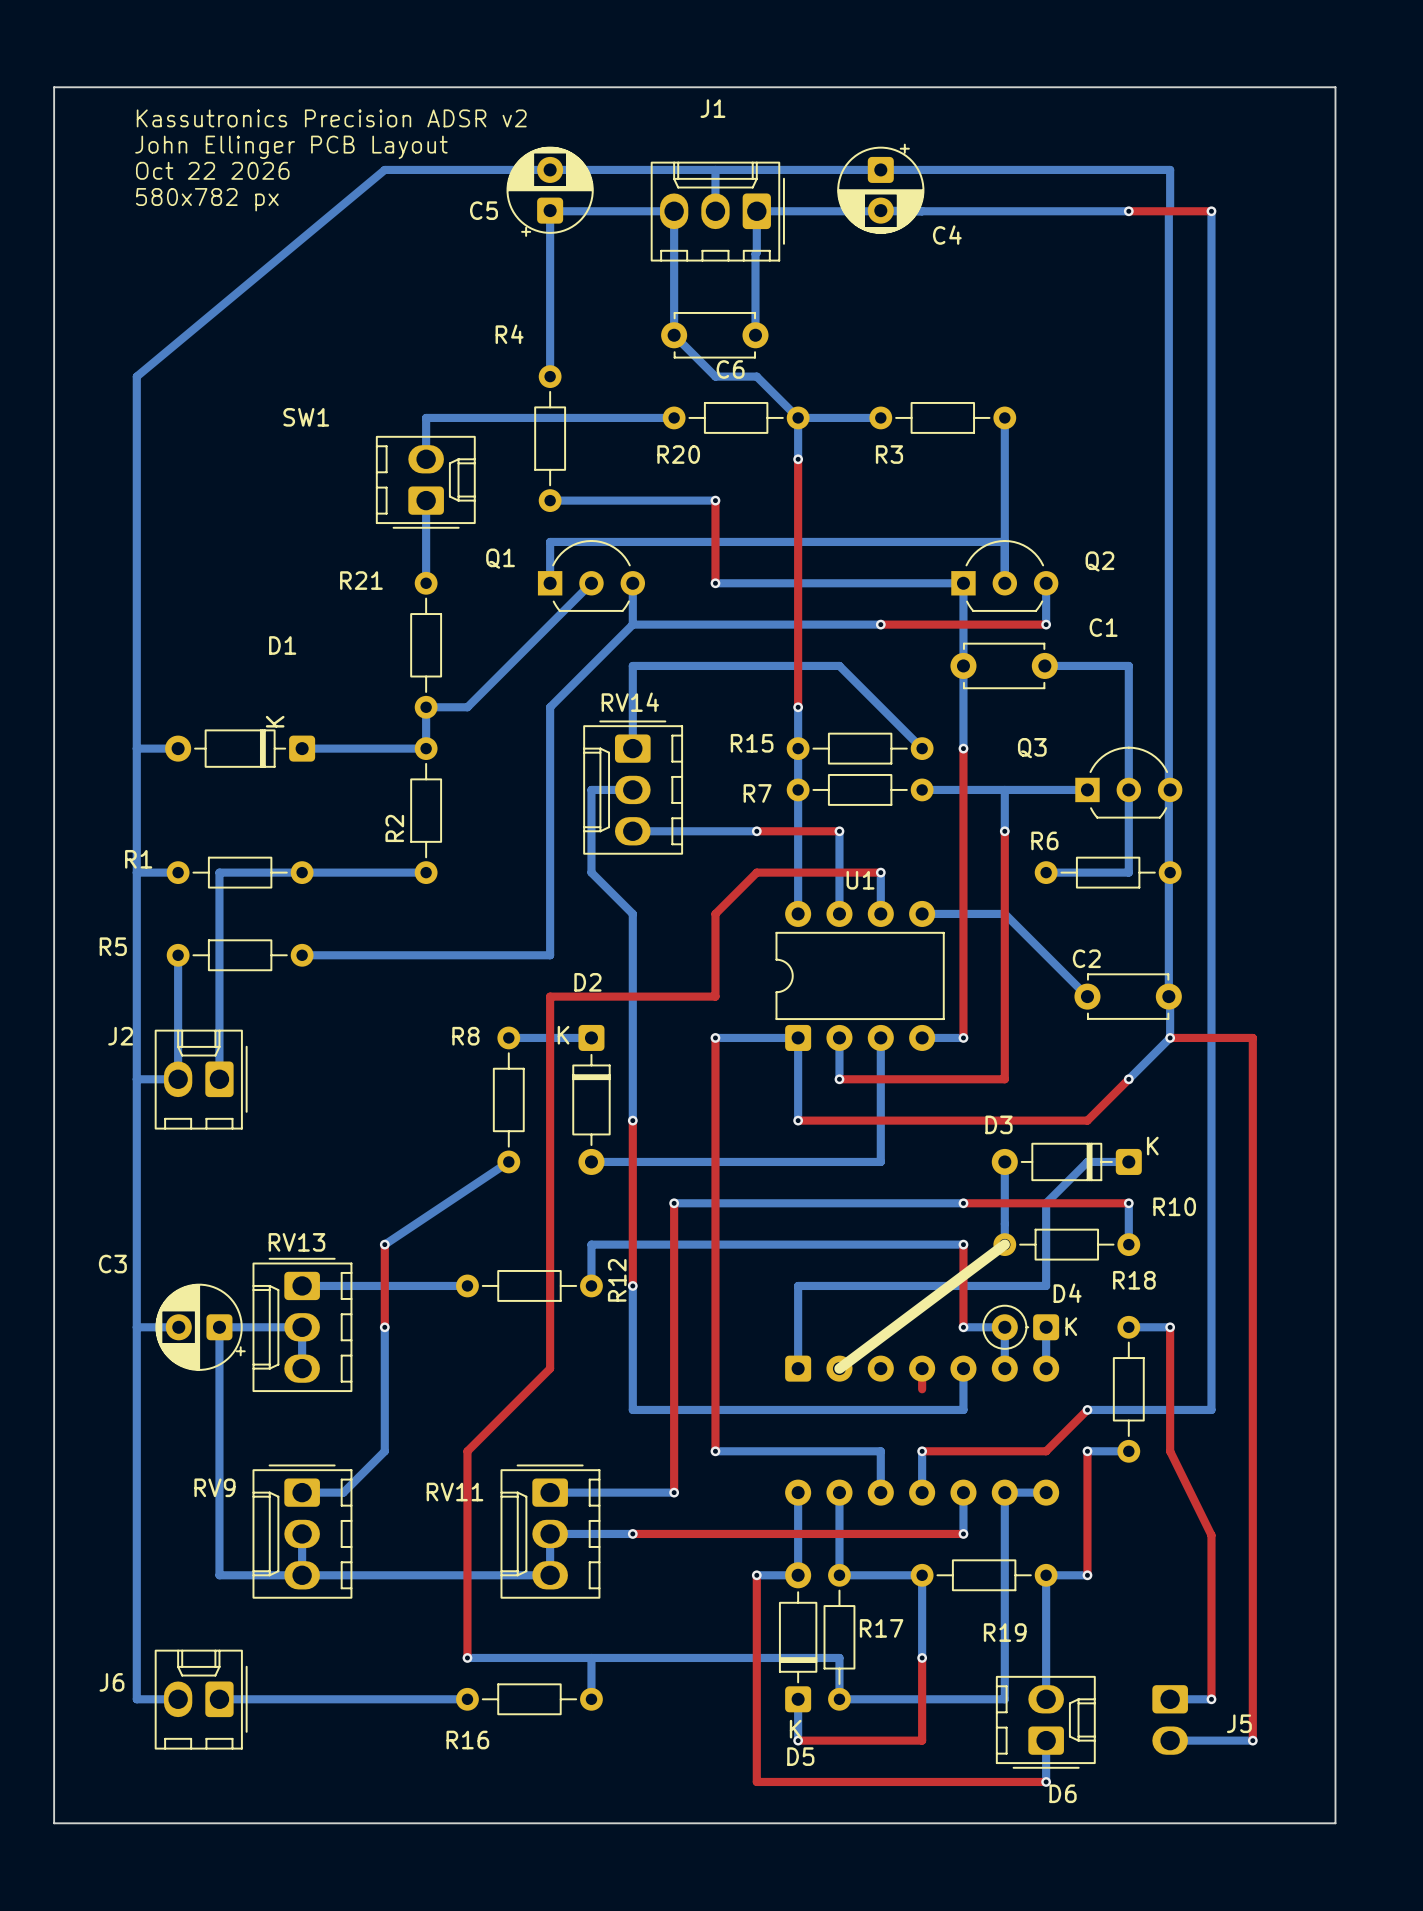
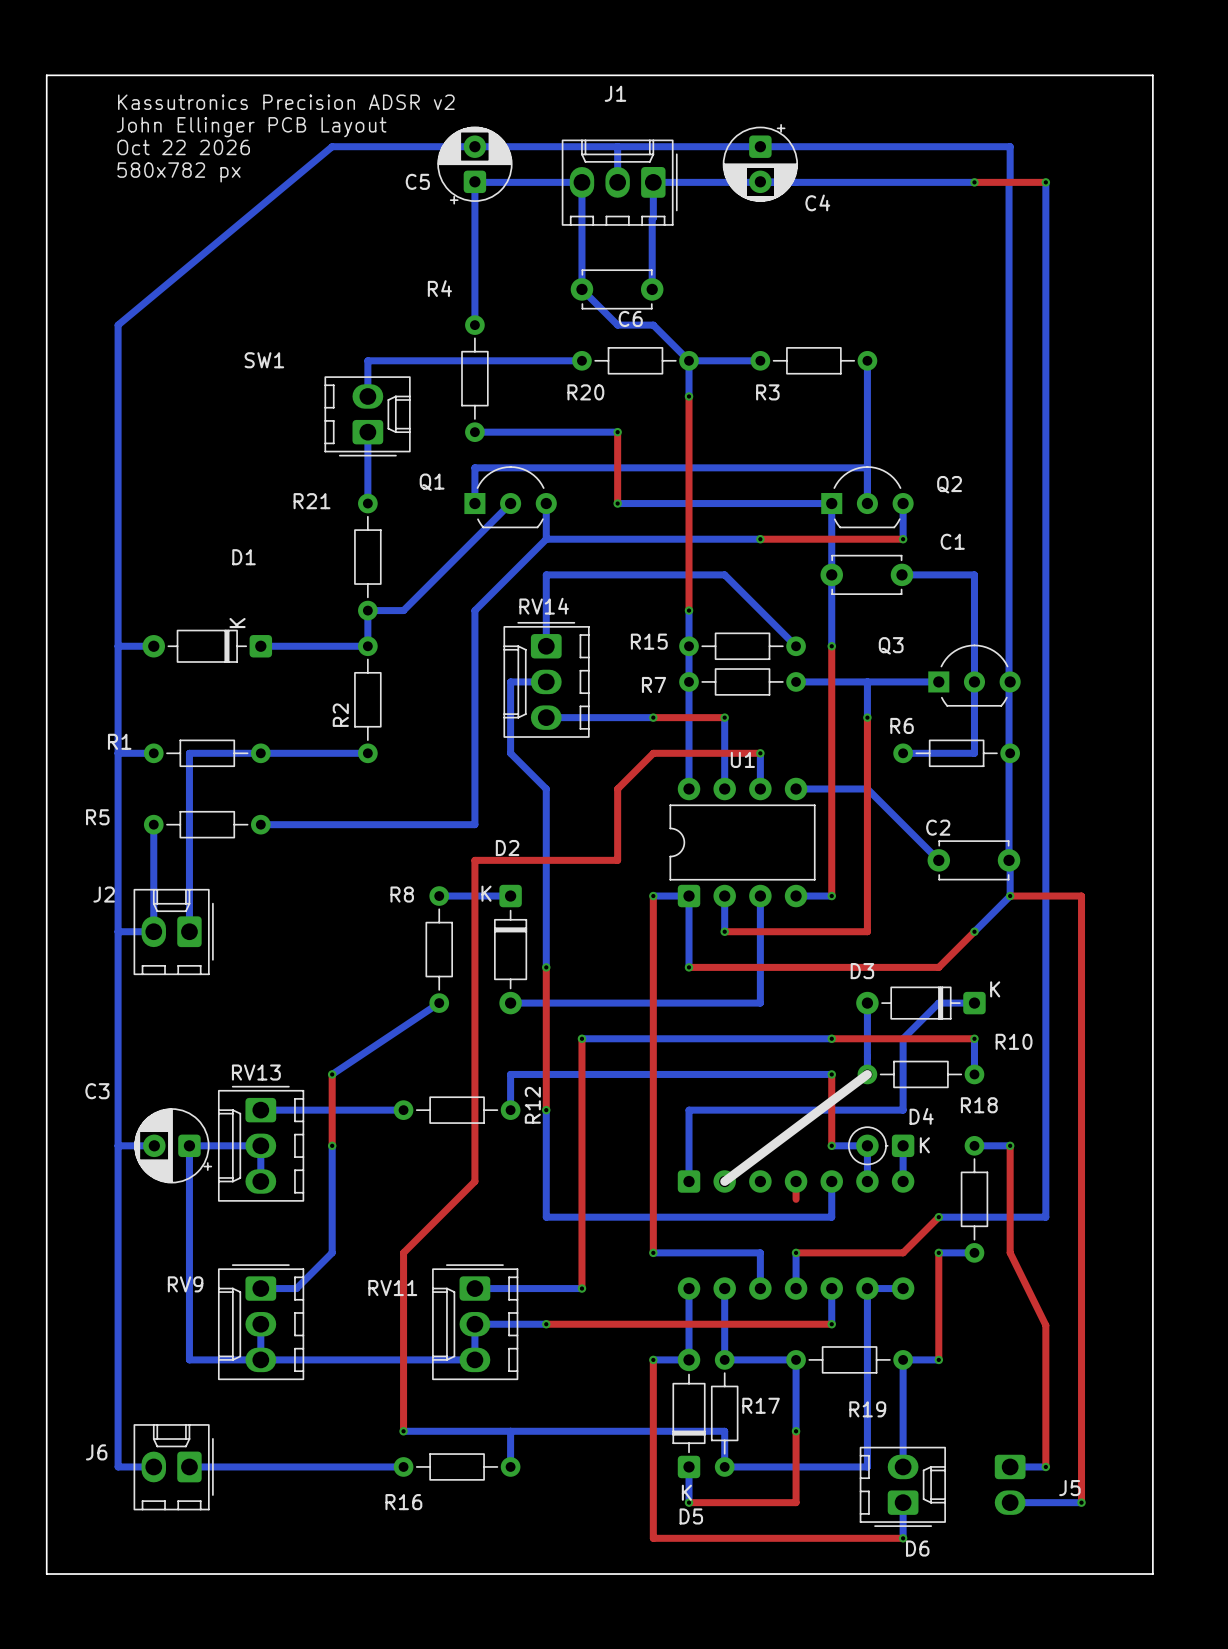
bottom track: (715, 1037) (756, 1037) -> none
top track: (715, 1037) (715, 1451) -> (653, 896) (653, 1252)
via position: (715, 1037) -> (653, 896)
bottom track: (715, 1451) (756, 1451) -> none
via position: (715, 1451) -> (653, 1252)

